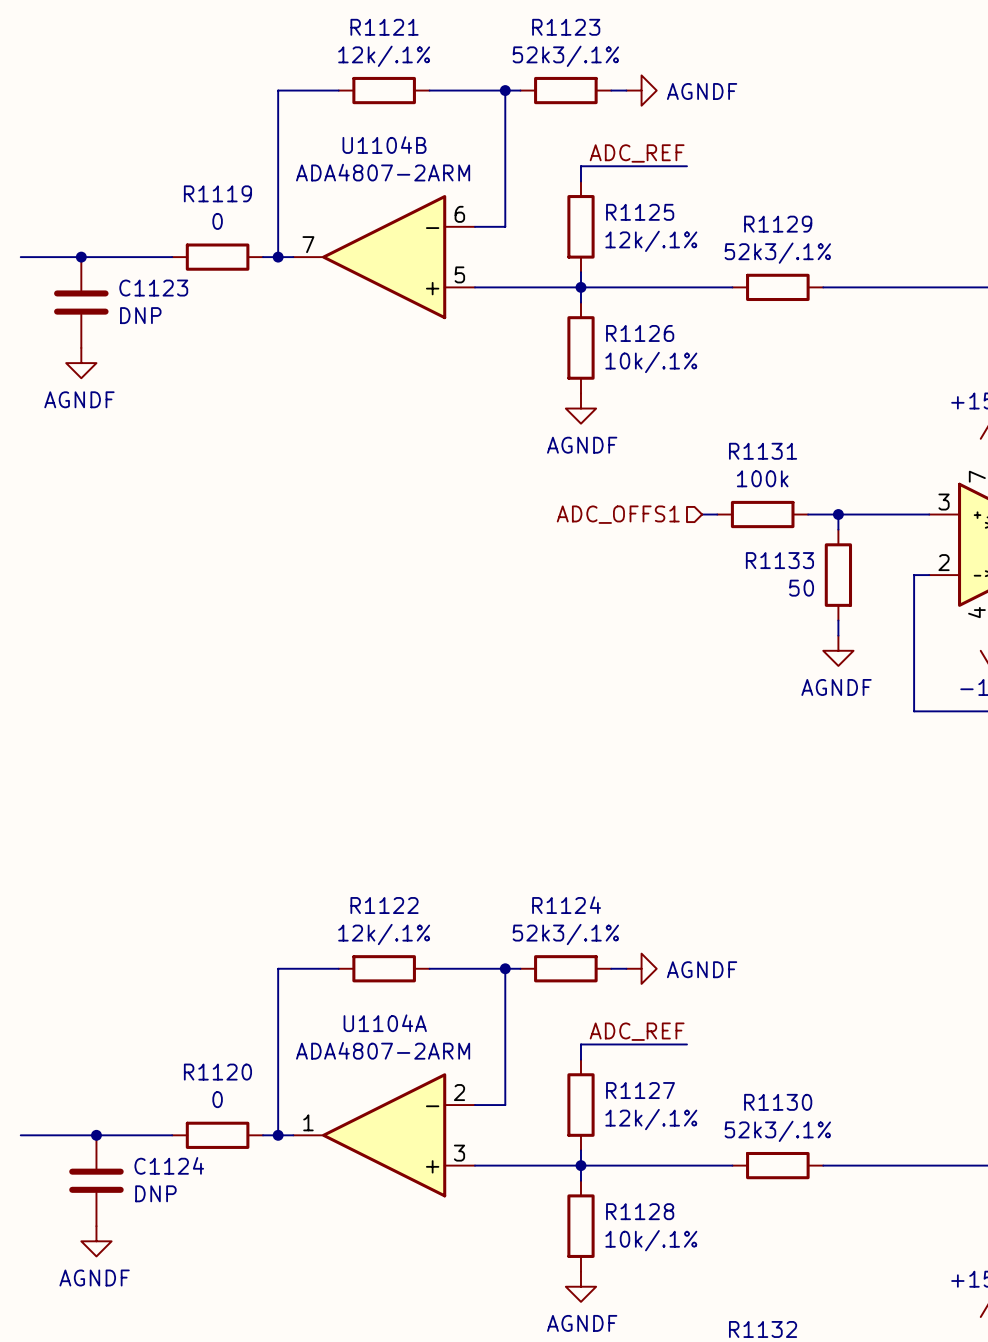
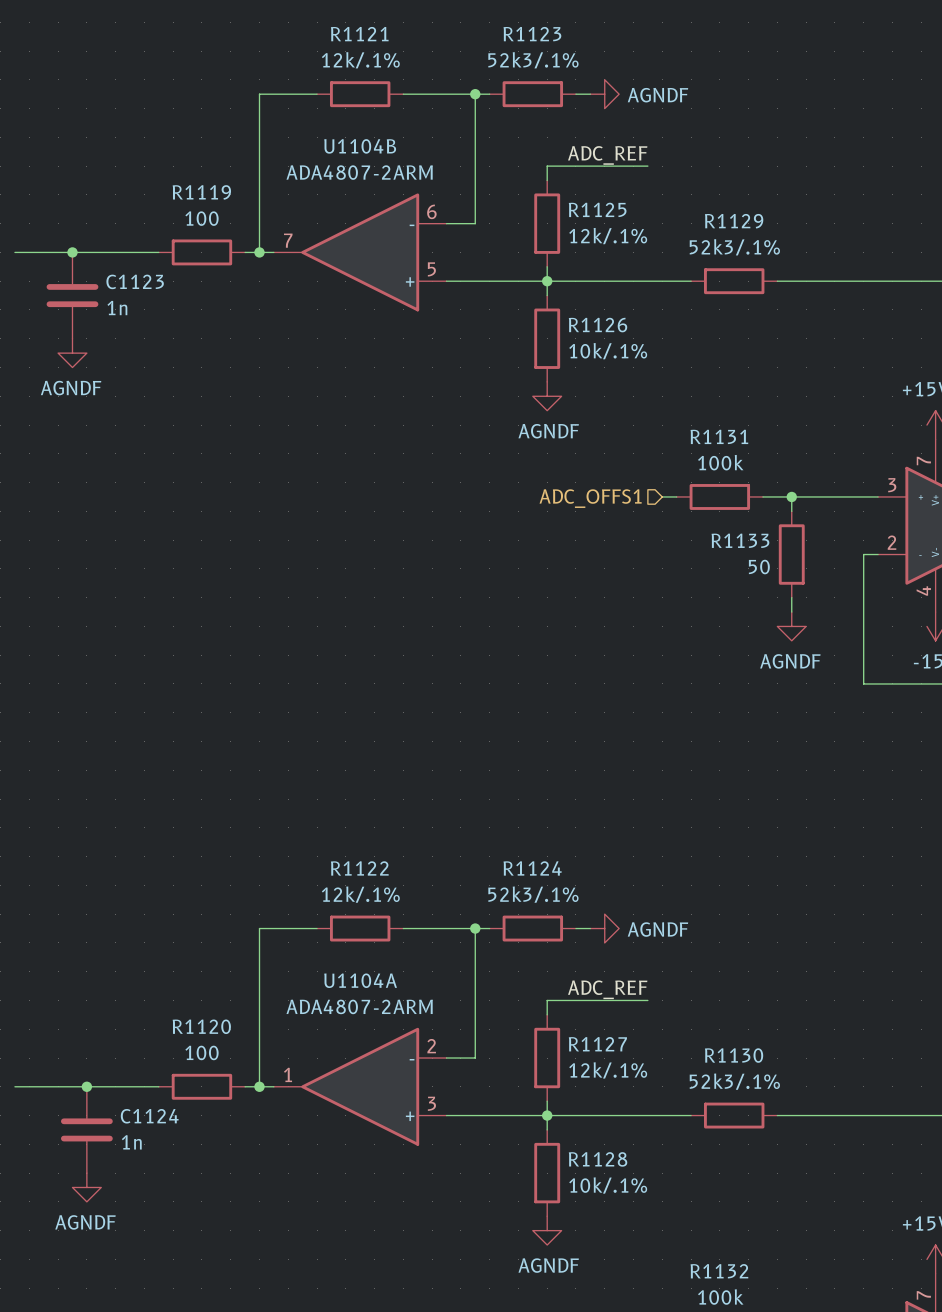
R1119 value: 0 (217, 221) -> 100 (201, 218)
C1123 value: DNP (140, 315) -> 1n (117, 307)
R1120 value: 0 (217, 1099) -> 100 (201, 1052)
C1124 value: DNP (155, 1193) -> 1n (131, 1142)

